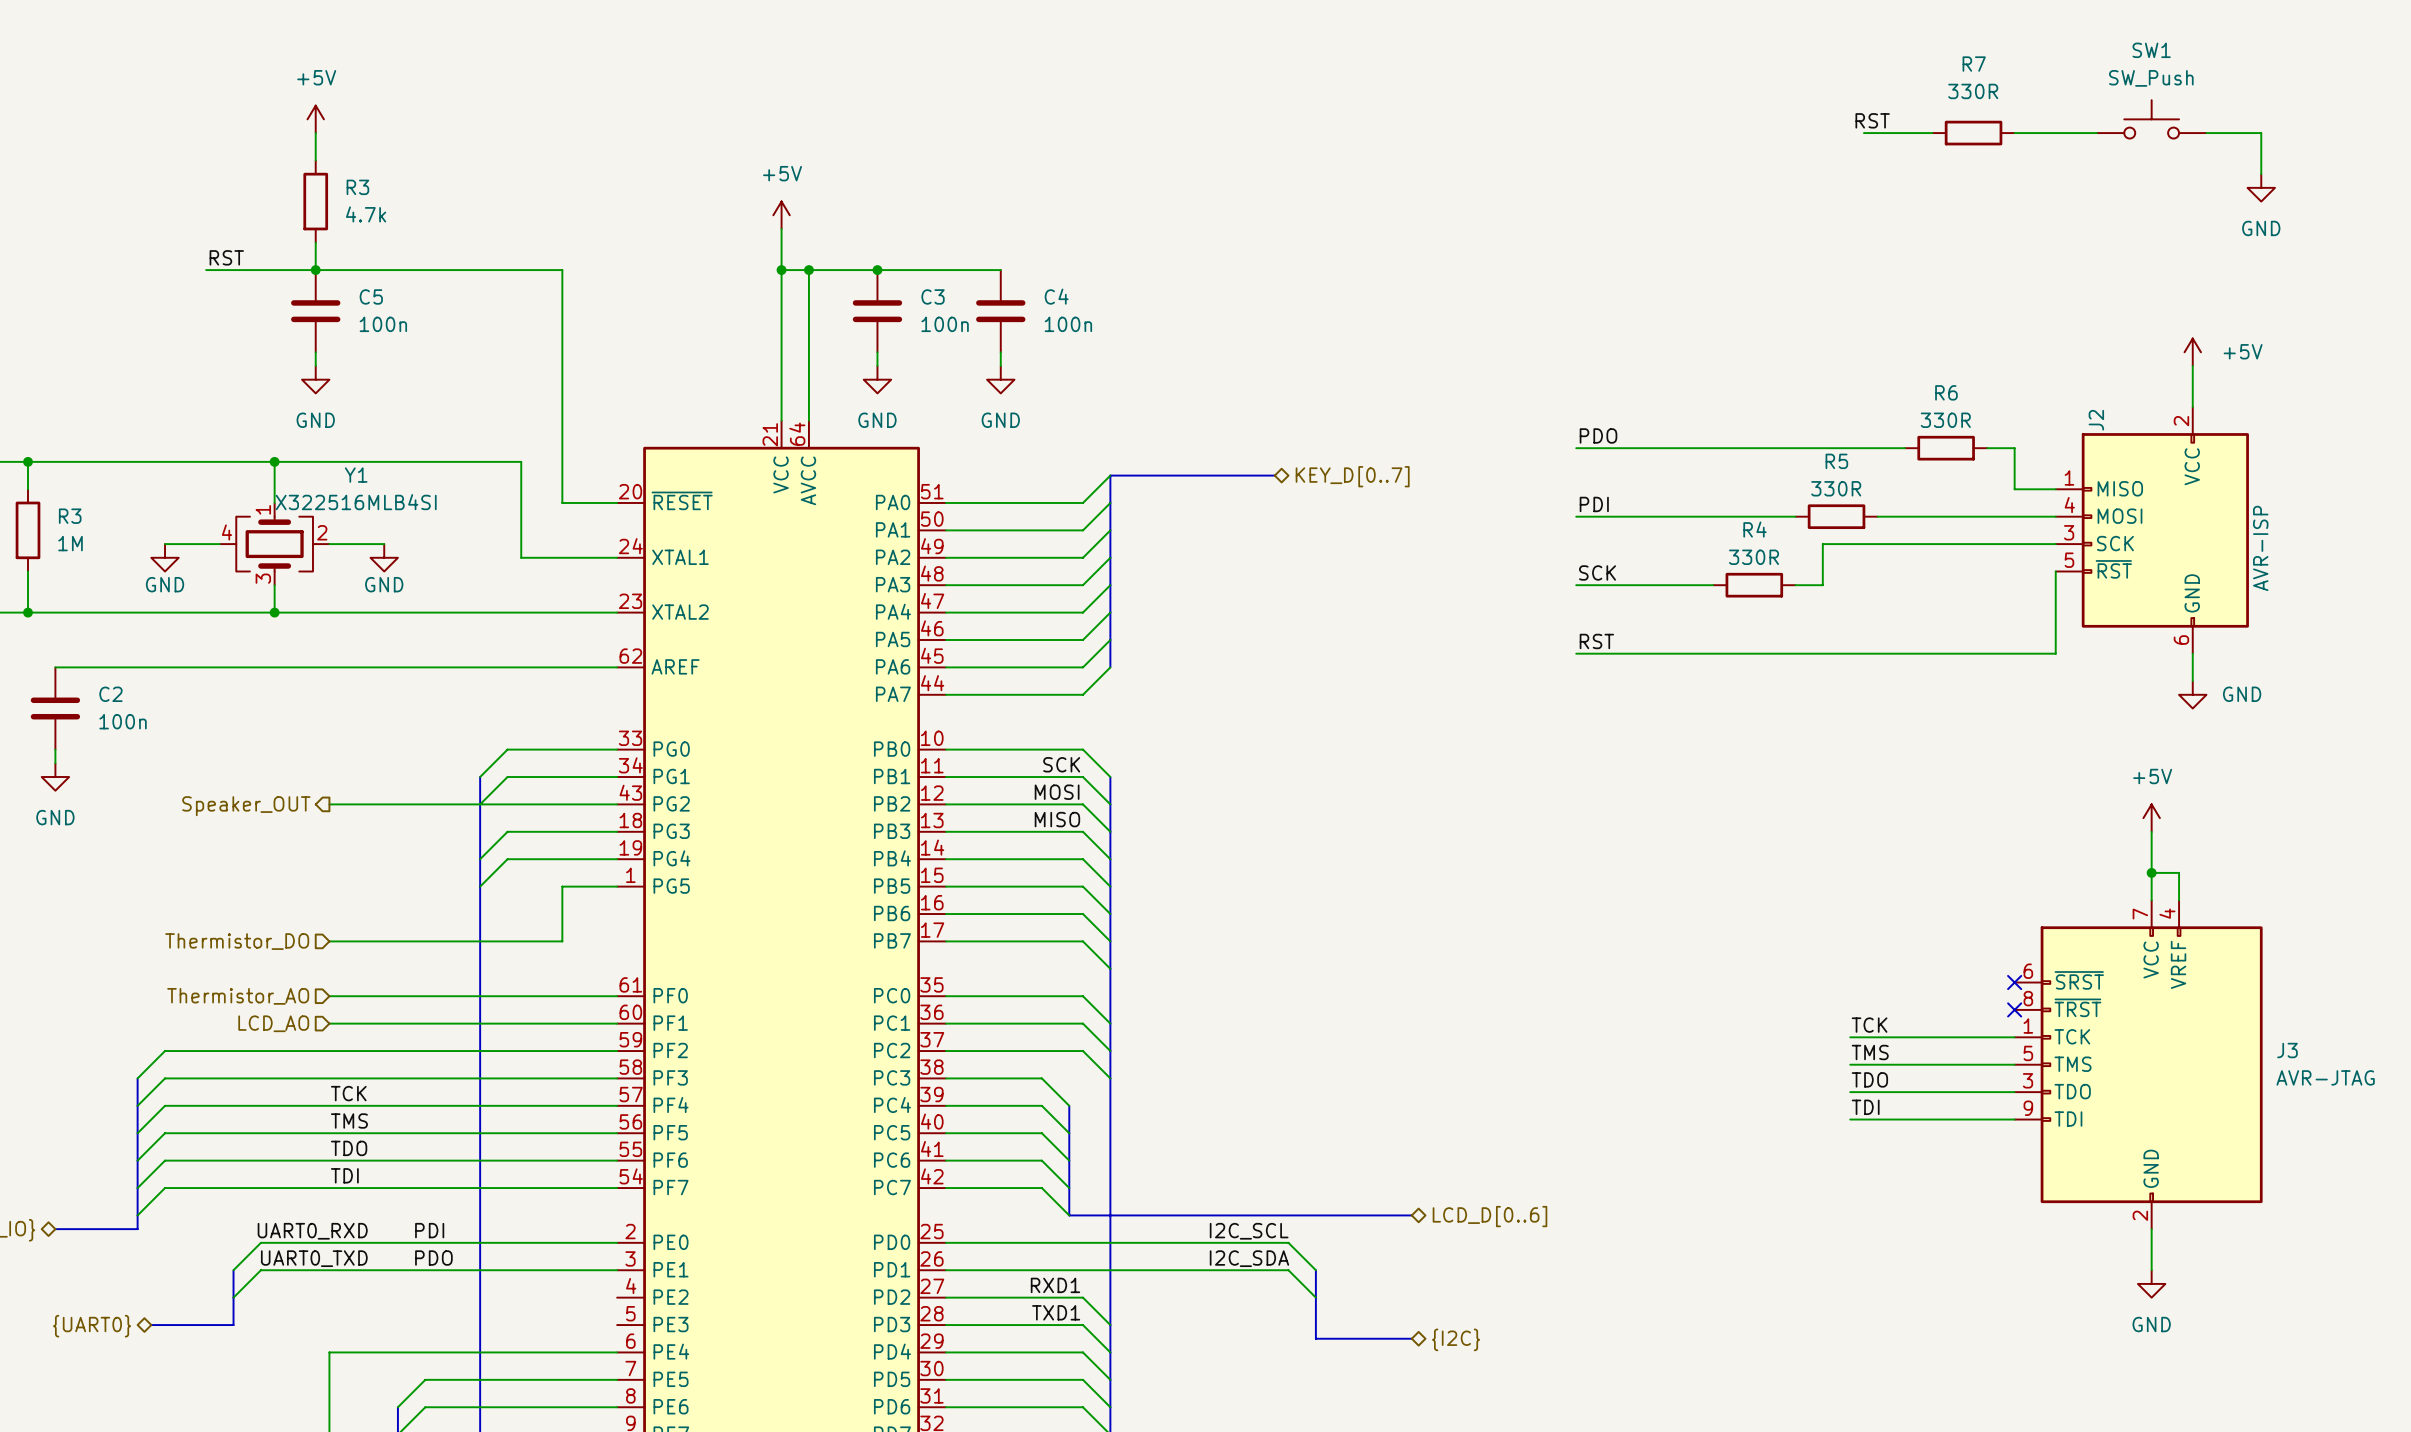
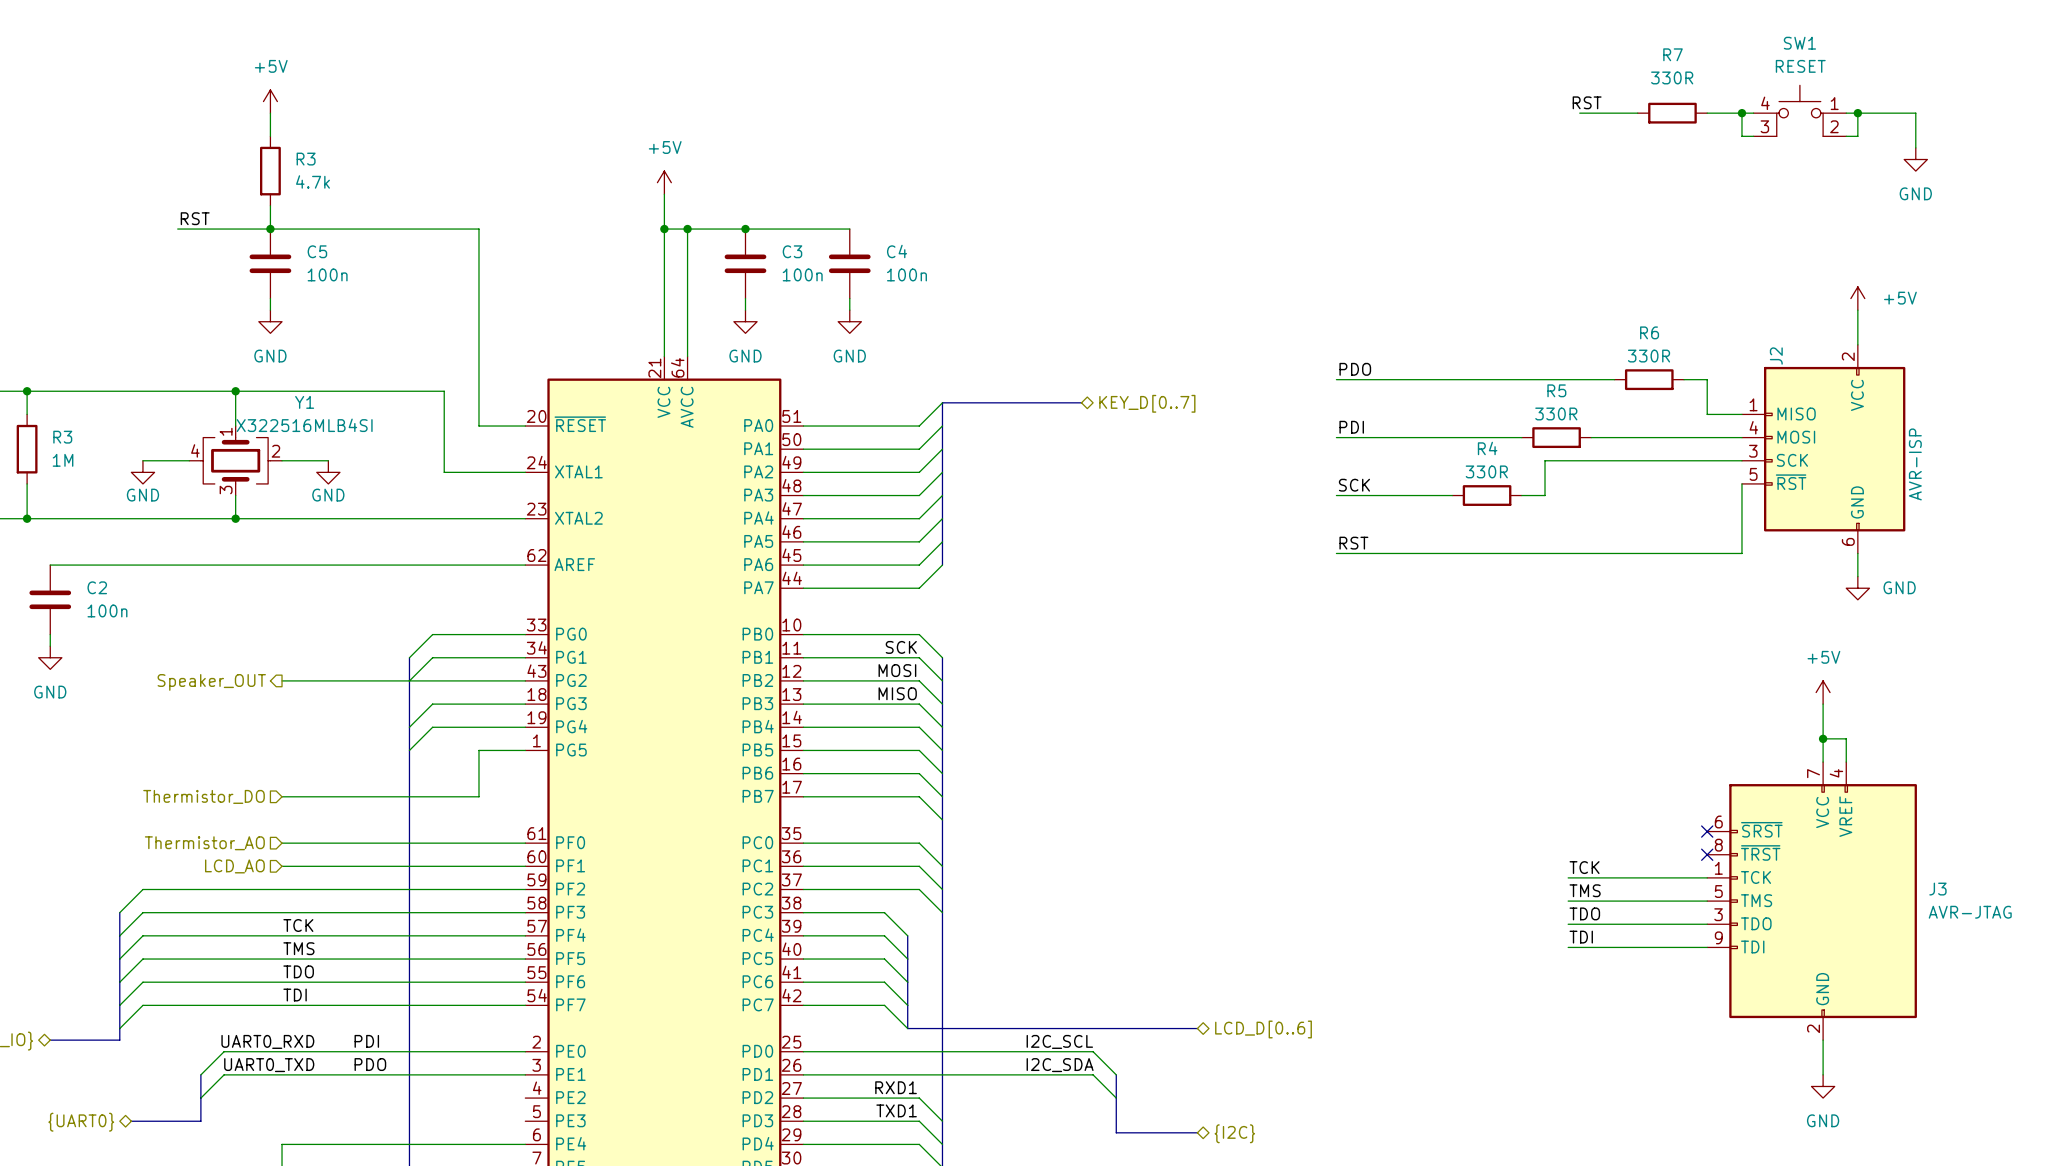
SW1 value: SW_Push (2151, 78) -> RESET (1800, 66)
SW1 symbol: [2096, 100, 2207, 139] -> [1753, 85, 1847, 137]
wire: none -> (1741, 113) (1741, 136) (1753, 136)
junction: none -> (1741, 113)
wire: none -> (1857, 113) (1857, 136) (1846, 136)
junction: none -> (1857, 113)

